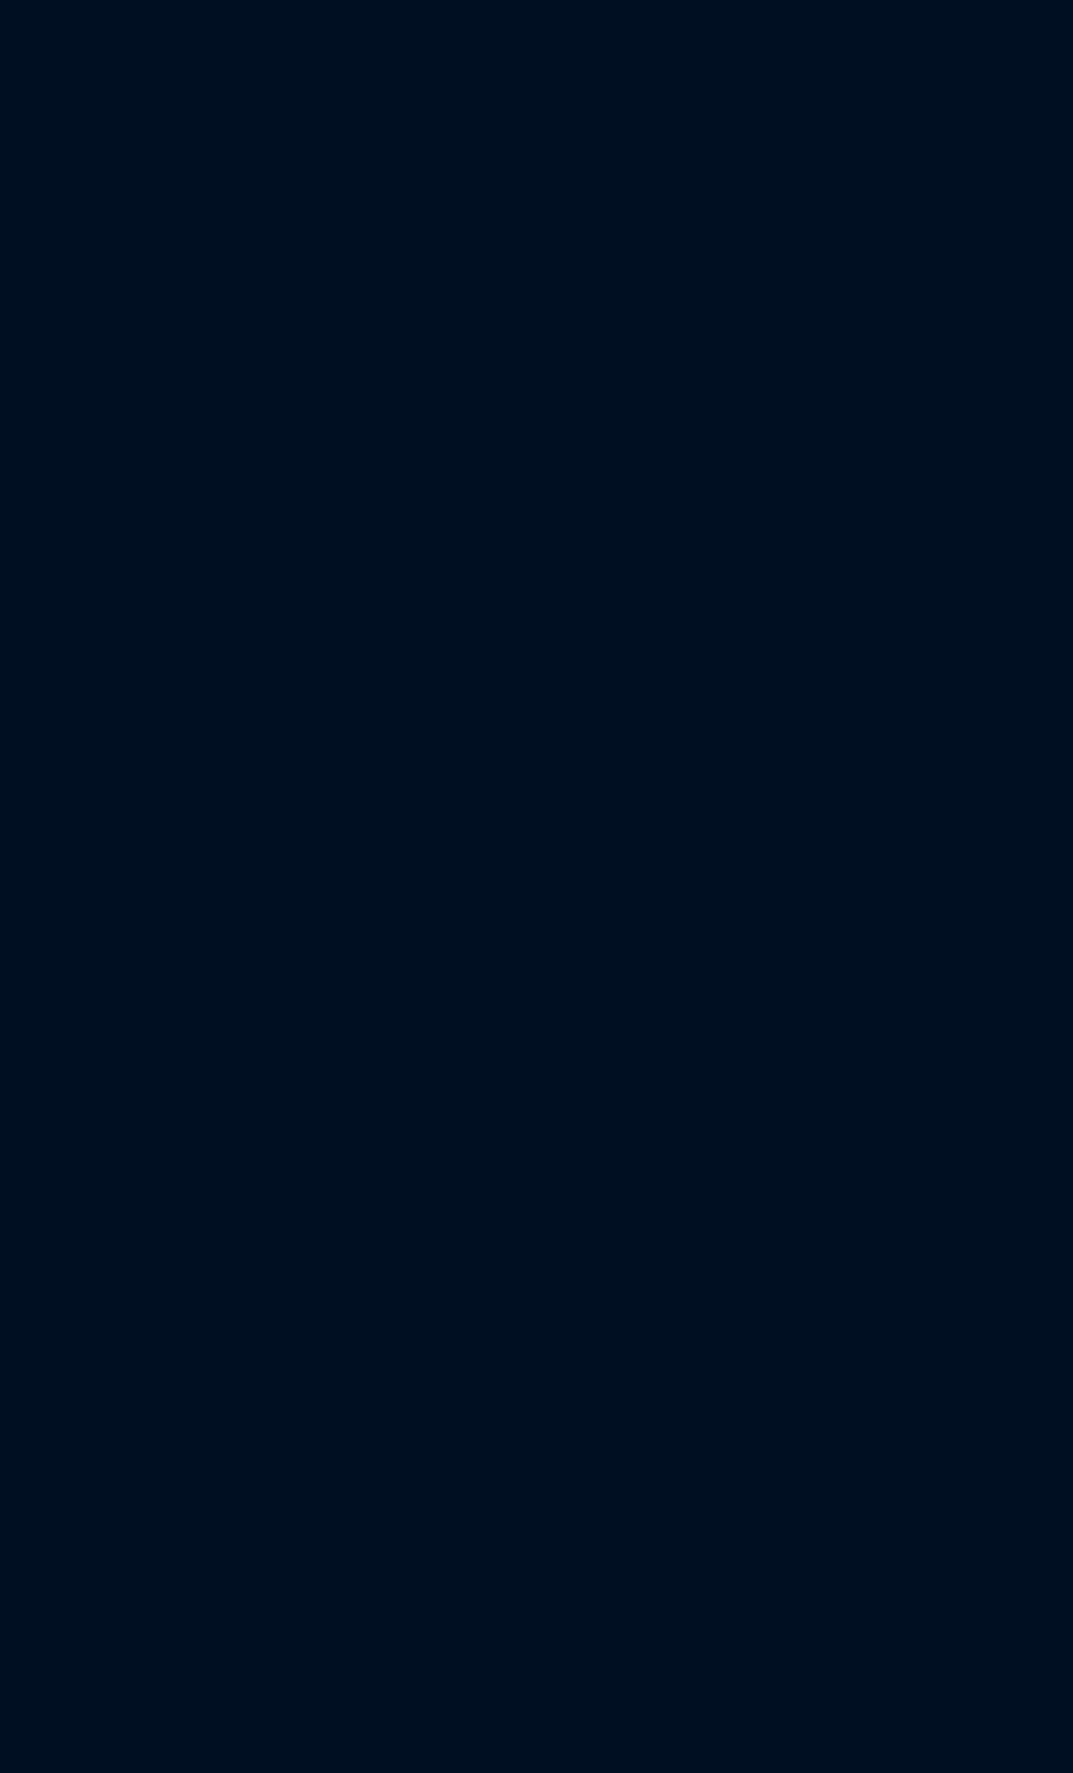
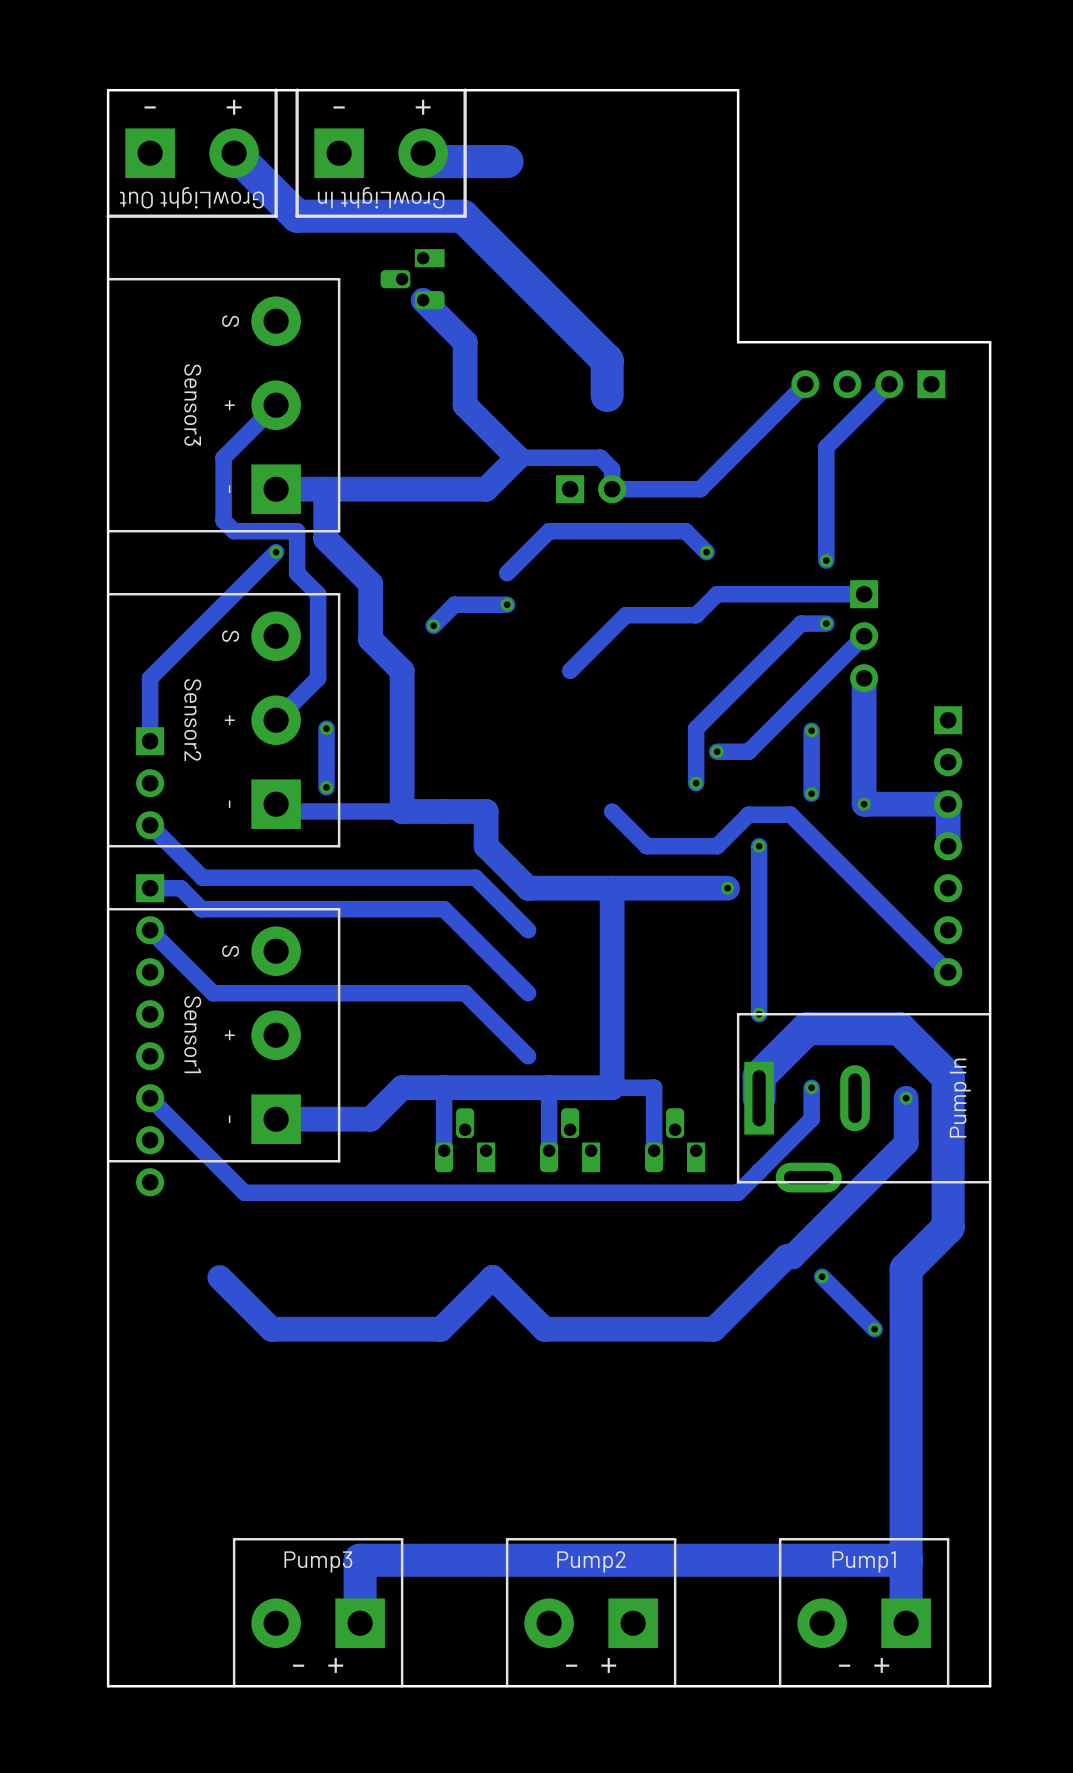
line: none -> (276, 90) (276, 216) (108, 216)
line: none -> (465, 90) (465, 216) (297, 216) (297, 90)
board edge: none -> (738, 90) (108, 90) (108, 1686) (990, 1686) (990, 342) (738, 342) (738, 90)
text: none -> + (234, 107)
text: none -> + (423, 107)
text: none -> - (150, 107)
text: none -> - (339, 107)
part: none -> (192, 153)
track: none -> (234, 153) (297, 216) (462, 216) (607, 360) (607, 395)
part: none -> (381, 153)
track: none -> (423, 153) (431, 161) (507, 161)
text: none -> GrowLight Out (191, 197)
text: none -> GrowLight In (381, 197)
line: none -> (108, 279) (339, 279) (339, 531) (108, 531)
part: none -> (412, 279)
track: none -> (423, 300) (465, 342) (465, 405) (517, 457)
text: none -> S (230, 321)
track: none -> (805, 384) (700, 489) (612, 489) (612, 469) (600, 457) (517, 457)
part: none -> (868, 384)
track: none -> (889, 384) (826, 447) (826, 560)
text: none -> Sensor3 (192, 405)
text: none -> + (229, 405)
track: none -> (276, 405) (223, 457) (223, 520) (234, 531) (297, 531) (297, 573) (318, 594) (318, 678) (276, 720)
part: none -> (276, 405)
track: none -> (517, 457) (486, 489) (276, 489)
text: none -> - (229, 489)
track: none -> (325, 489) (325, 538) (370, 583) (370, 639) (402, 670) (402, 811)
part: none -> (591, 489)
track: none -> (276, 552) (150, 678) (150, 741)
via: none -> (276, 552)
track: none -> (706, 552) (685, 531) (549, 531) (507, 573)
via: none -> (706, 552)
via: none -> (826, 560)
line: none -> (108, 594) (339, 594) (339, 846) (108, 846)
track: none -> (864, 594) (717, 594) (696, 615) (625, 615) (570, 670)
track: none -> (507, 604) (454, 604) (433, 625)
via: none -> (507, 604)
track: none -> (826, 623) (801, 623) (696, 728) (696, 783)
via: none -> (826, 623)
via: none -> (433, 625)
text: none -> S (230, 636)
track: none -> (864, 636) (748, 751) (717, 751)
part: none -> (864, 636)
track: none -> (864, 678) (864, 804) (948, 804) (948, 846)
text: none -> Sensor2 (192, 720)
text: none -> + (229, 720)
part: none -> (276, 720)
track: none -> (326, 728) (326, 787)
via: none -> (326, 728)
track: none -> (811, 730) (811, 793)
via: none -> (811, 730)
via: none -> (717, 751)
part: none -> (150, 783)
via: none -> (696, 783)
via: none -> (326, 787)
via: none -> (811, 793)
text: none -> - (229, 804)
track: none -> (276, 804) (283, 811) (402, 811)
via: none -> (864, 804)
track: none -> (402, 811) (486, 811) (486, 846) (528, 888) (727, 888)
track: none -> (612, 811) (646, 846) (717, 846) (748, 814) (790, 814) (948, 972)
track: none -> (150, 825) (202, 877) (475, 877) (528, 930)
track: none -> (759, 846) (759, 1014)
via: none -> (759, 846)
part: none -> (948, 846)
track: none -> (150, 888) (180, 888) (201, 909) (444, 909) (528, 993)
track: none -> (612, 888) (612, 1087)
via: none -> (727, 888)
line: none -> (108, 909) (339, 909) (339, 1161) (108, 1161)
track: none -> (150, 930) (213, 993) (465, 993) (528, 1056)
text: none -> S (230, 951)
via: none -> (759, 1014)
line: none -> (990, 1014) (738, 1014) (738, 1182) (990, 1182)
part: none -> (150, 1035)
text: none -> Sensor1 (192, 1034)
text: none -> + (229, 1035)
part: none -> (276, 1035)
track: none -> (444, 1087) (444, 1150)
track: none -> (549, 1087) (549, 1150)
track: none -> (612, 1087) (654, 1087) (654, 1150)
track: none -> (612, 1087) (402, 1087) (370, 1119) (276, 1119)
track: none -> (811, 1087) (811, 1119) (738, 1192) (244, 1192) (150, 1098)
via: none -> (811, 1087)
track: none -> (759, 1098) (759, 1076) (807, 1028) (899, 1028) (948, 1077) (948, 1227) (906, 1269) (906, 1623)
track: none -> (906, 1098) (906, 1143) (792, 1256) (786, 1256) (713, 1329) (544, 1329) (492, 1277) (440, 1329) (271, 1329) (219, 1277)
via: none -> (906, 1098)
text: none -> - (229, 1119)
part: none -> Pump In (807, 1127)
part: none -> (465, 1140)
part: none -> (570, 1140)
part: none -> (675, 1140)
track: none -> (822, 1276) (874, 1329)
via: none -> (822, 1276)
via: none -> (874, 1329)
track: none -> (906, 1560) (360, 1560) (360, 1623)
text: none -> Pump3 (318, 1561)
text: none -> Pump2 (591, 1561)
text: none -> Pump1 (864, 1561)
part: none -> (318, 1623)
part: none -> (591, 1623)
part: none -> (864, 1623)
text: none -> - + (318, 1665)
text: none -> - + (591, 1665)
text: none -> - + (864, 1665)
line: none -> (402, 1686) (402, 1539) (234, 1539) (234, 1686)
line: none -> (675, 1686) (675, 1539) (507, 1539) (507, 1686)
line: none -> (948, 1686) (948, 1539) (780, 1539) (780, 1686)

